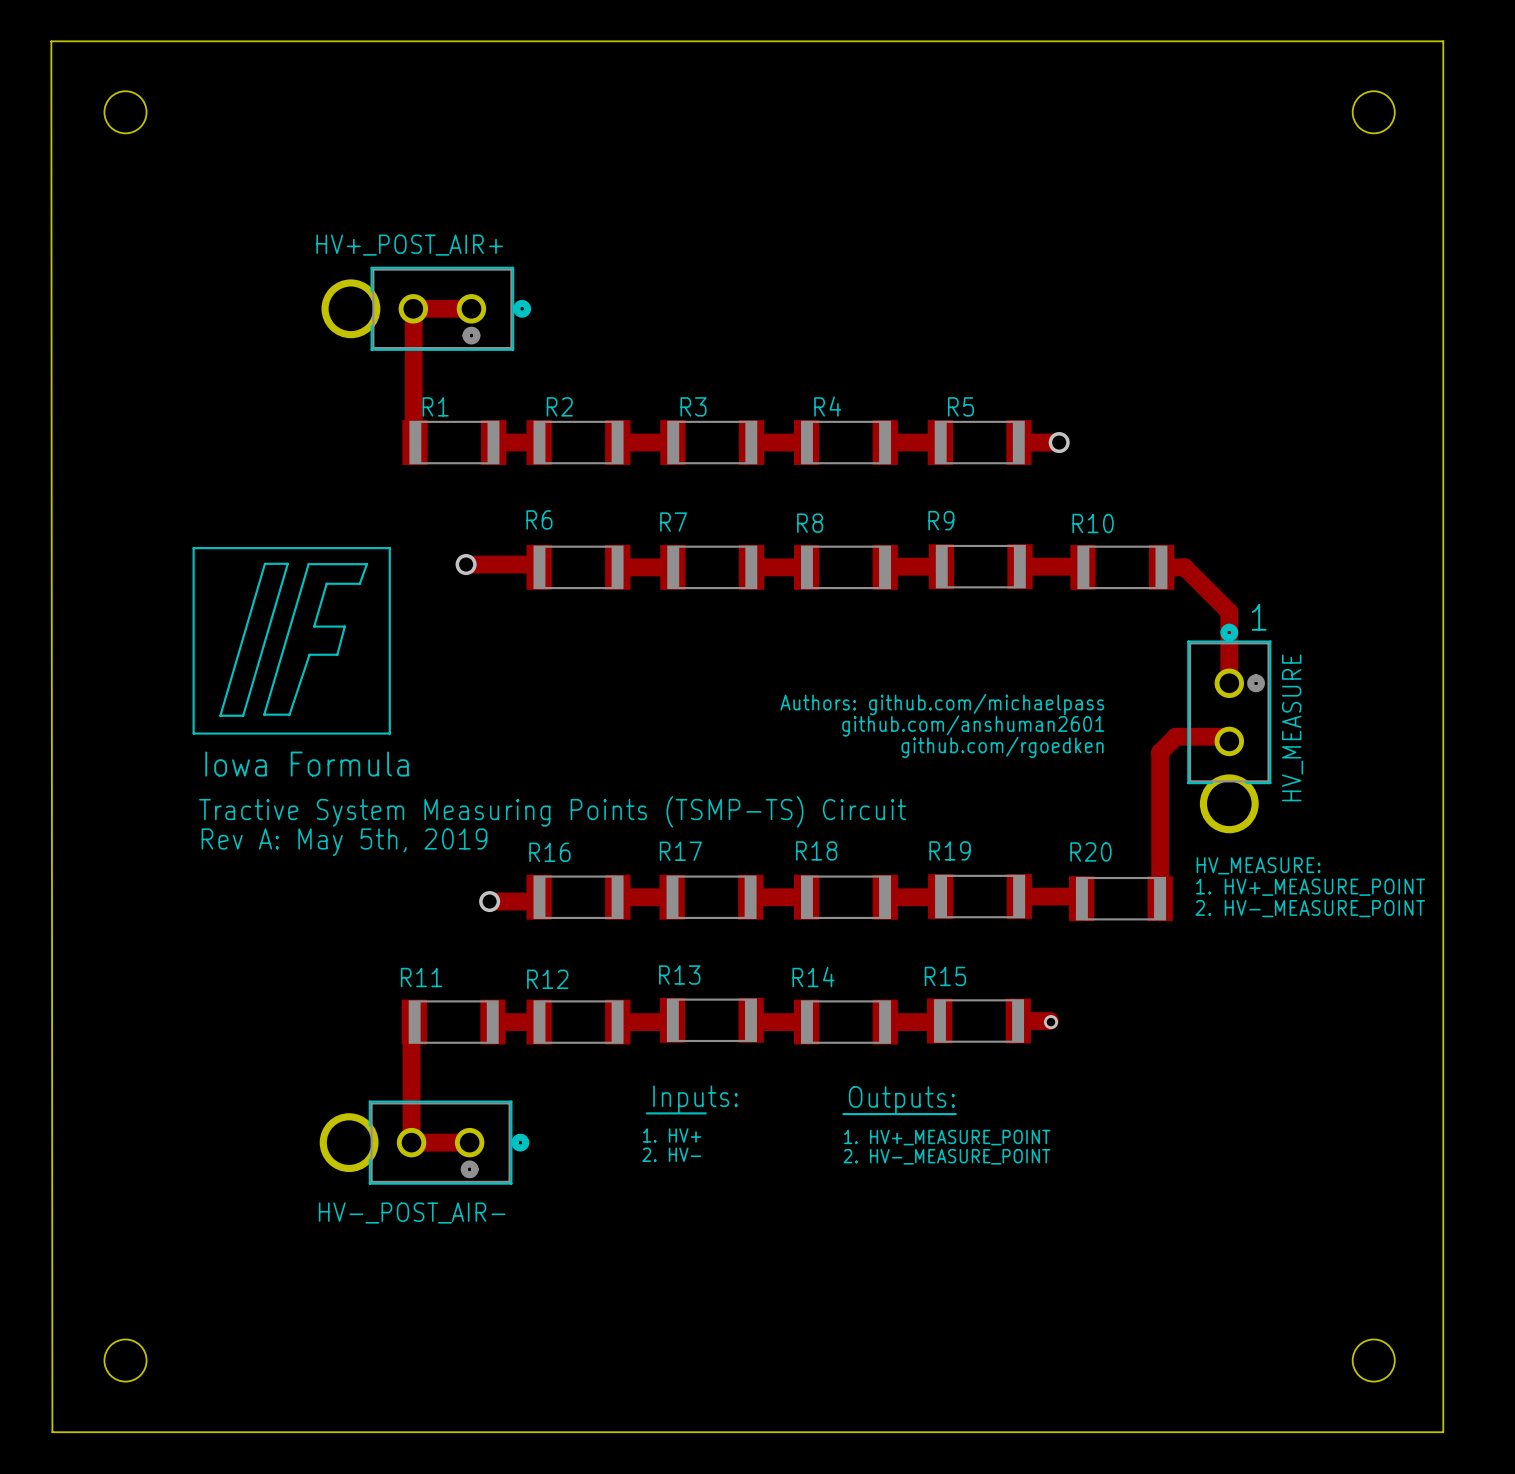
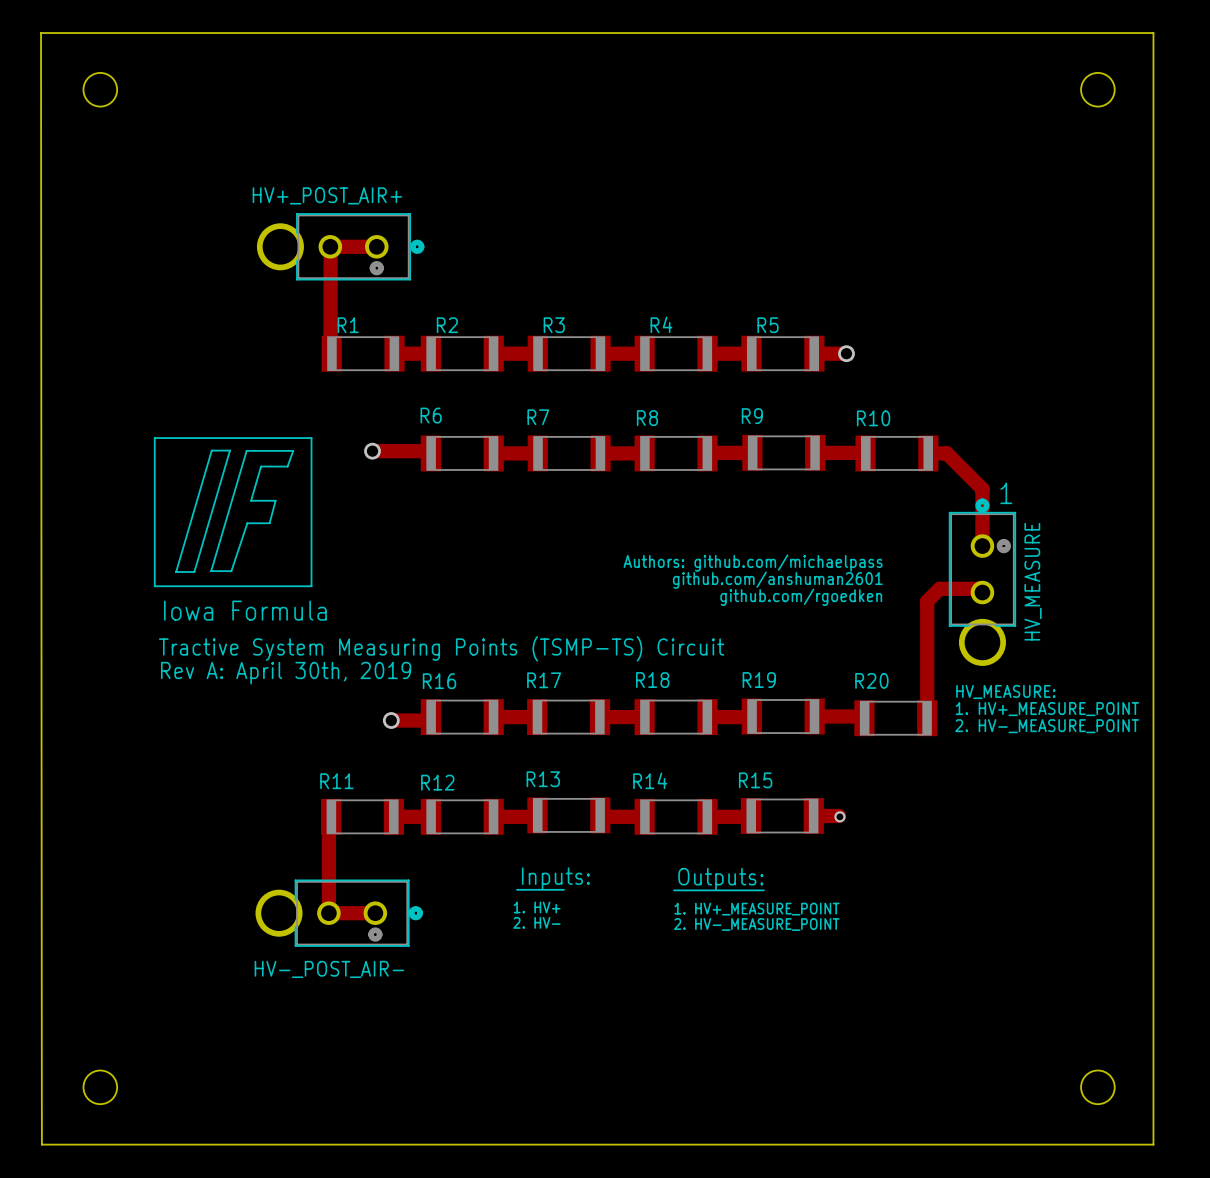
text: Rev A: May 5th, 2019 (344, 842) -> Rev A: April 30th, 2019 (286, 673)

